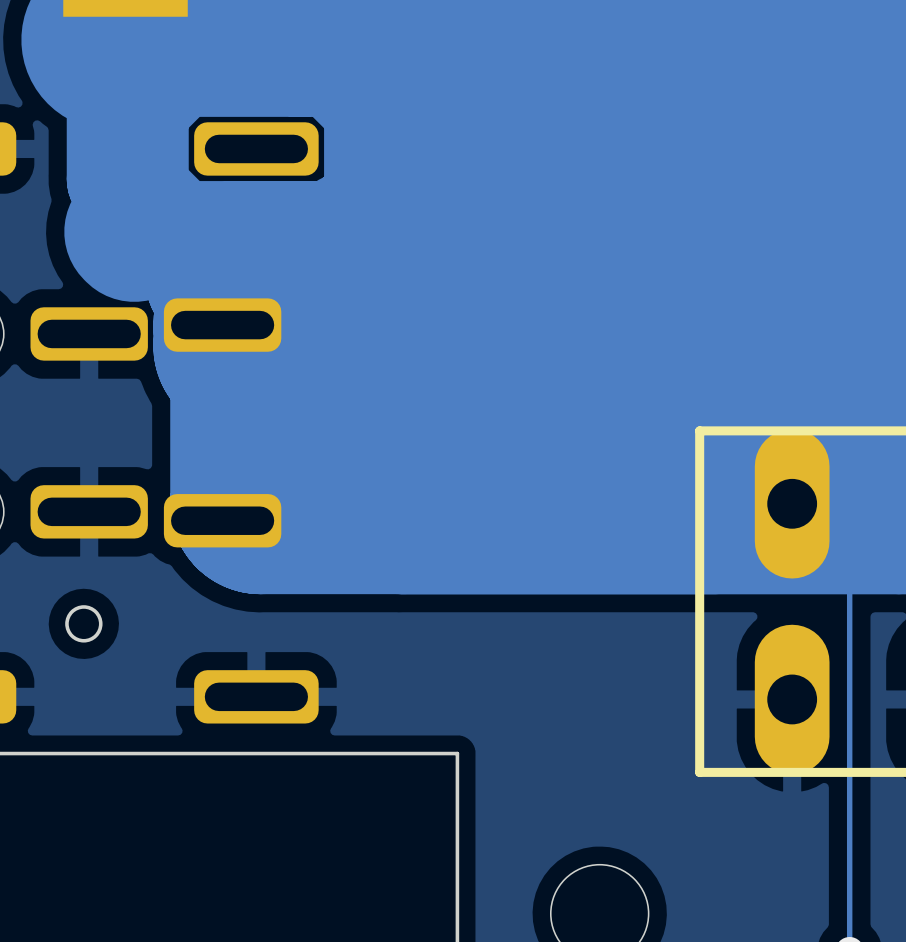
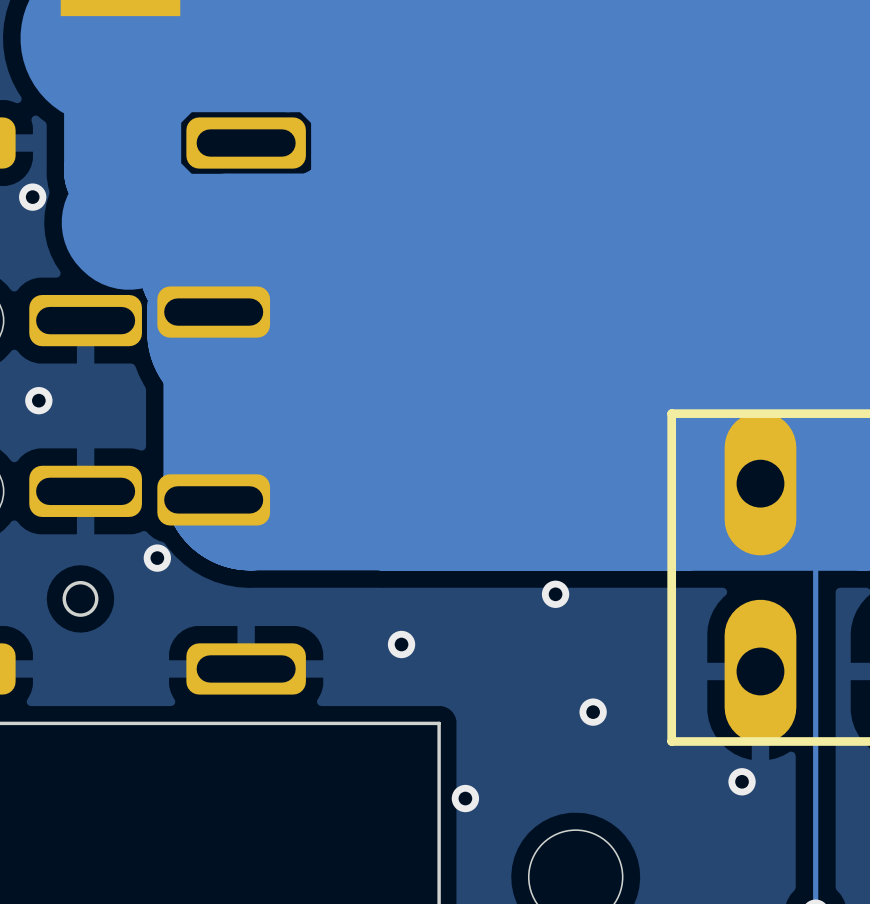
via: none -> (32, 197)
via: none -> (38, 400)
via: none -> (157, 558)
via: none -> (555, 594)
via: none -> (401, 644)
via: none -> (593, 712)
via: none -> (742, 781)
via: none -> (465, 798)

